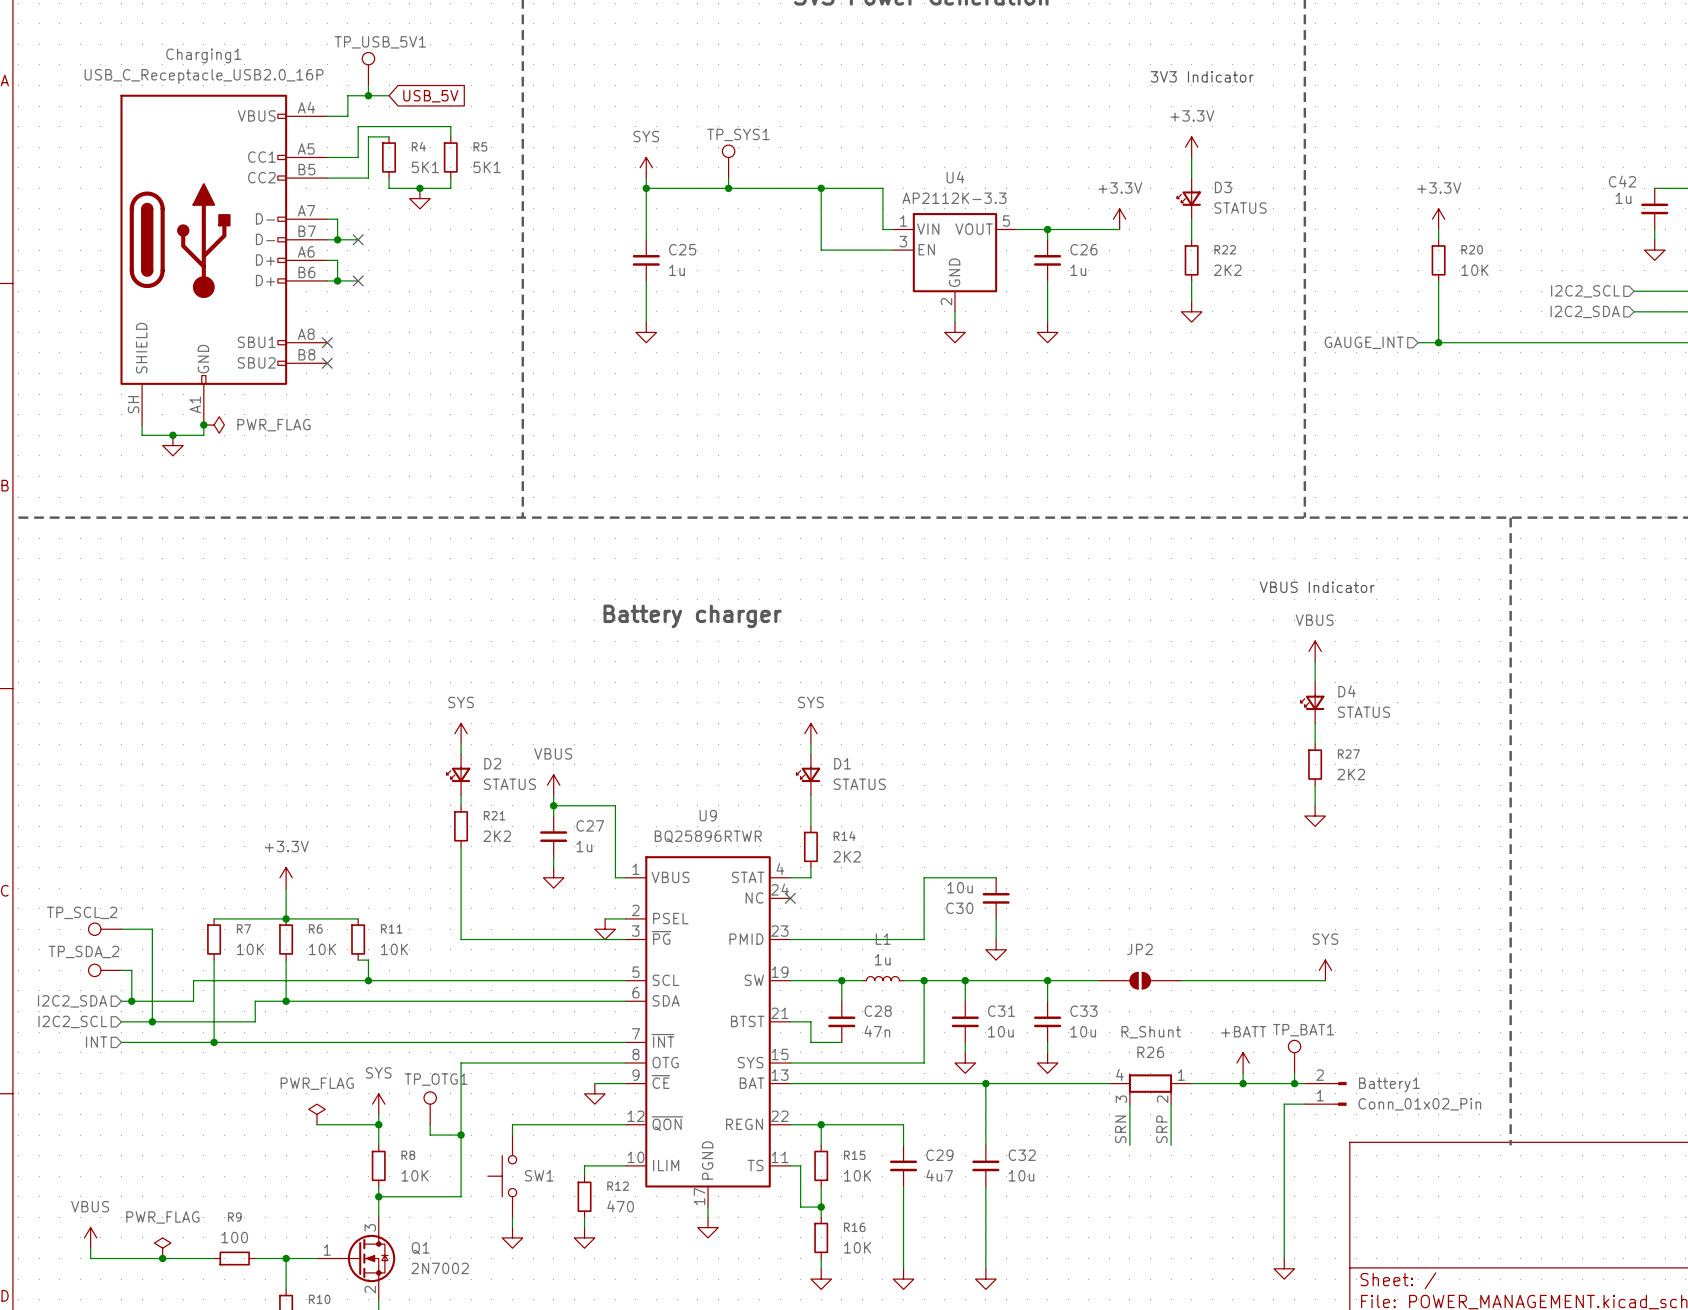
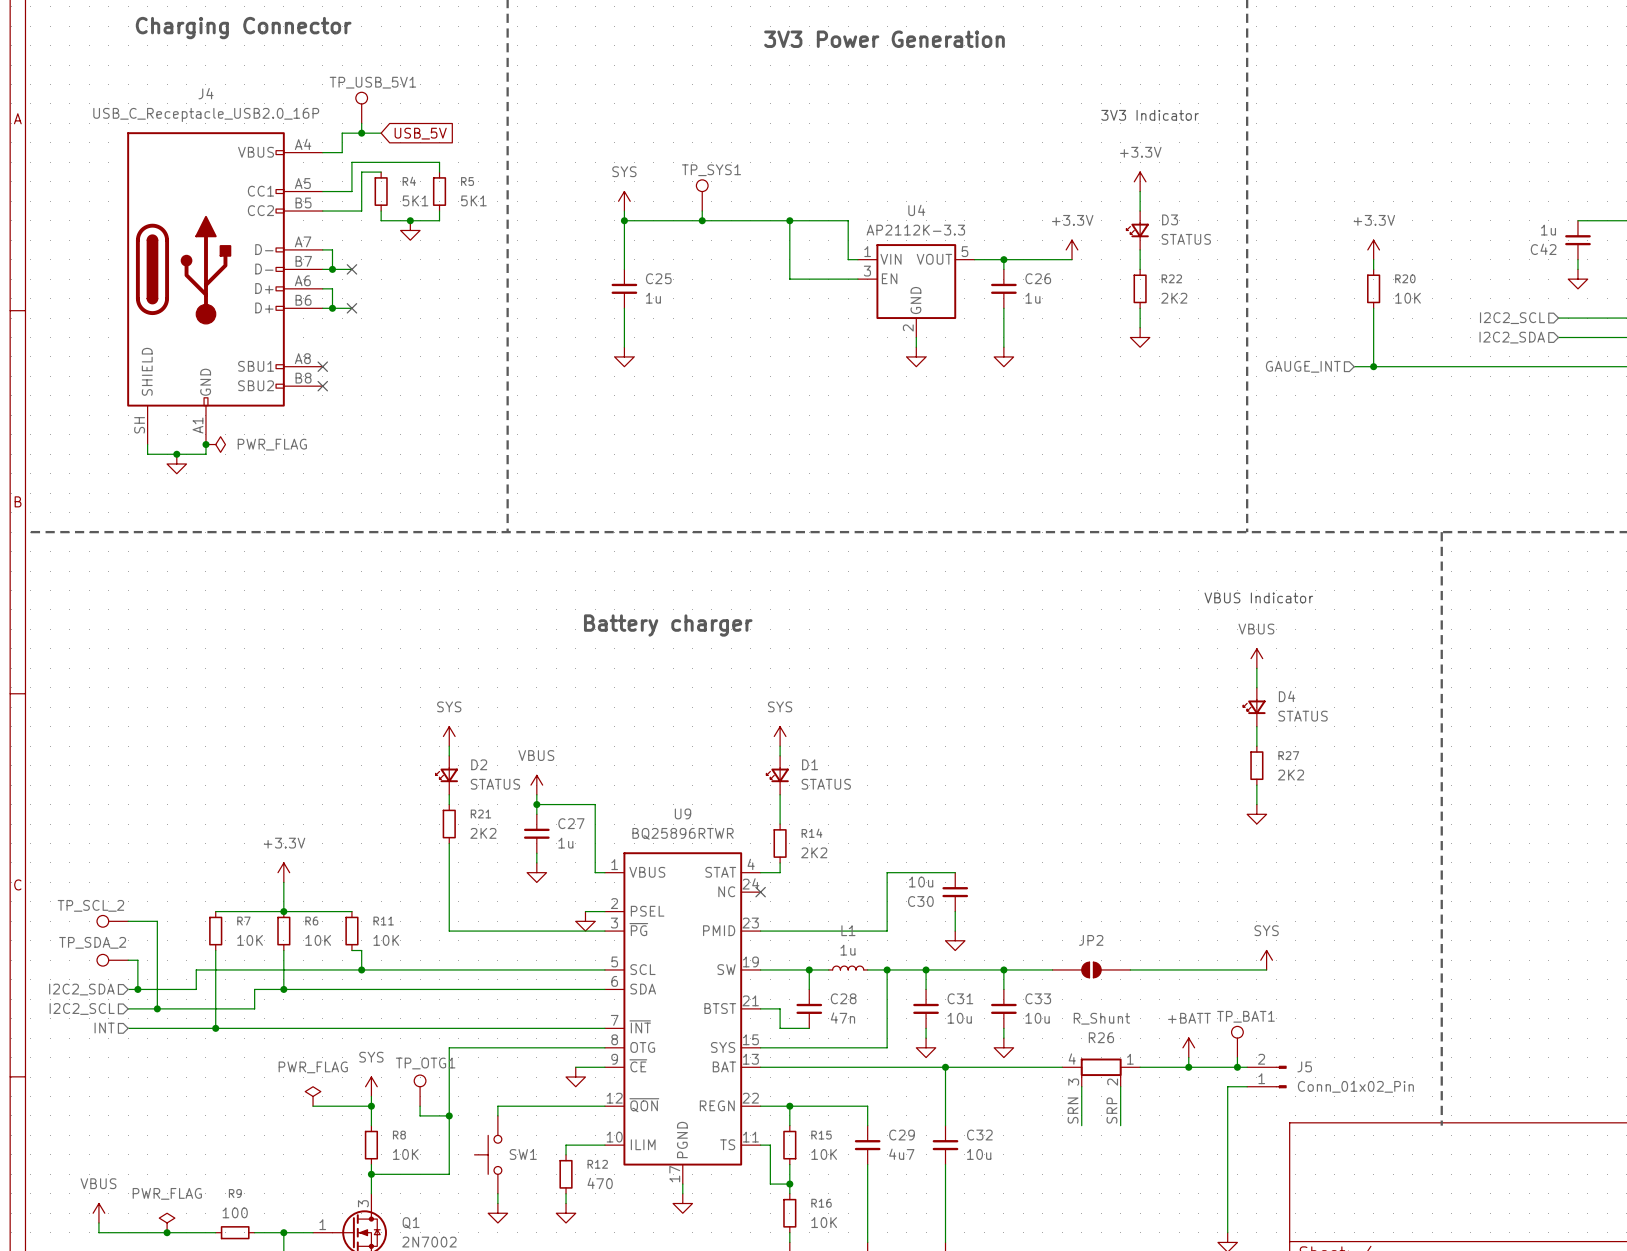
Charging1 name: Charging1 (203, 55) -> J4 (205, 93)
C42 name position: C42 (1622, 181) -> C42 (1543, 249)
Battery1 name: Battery1 (1389, 1084) -> J5 (1304, 1066)

